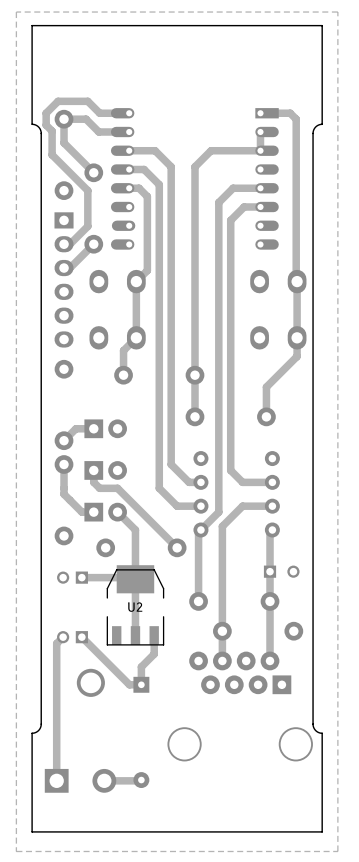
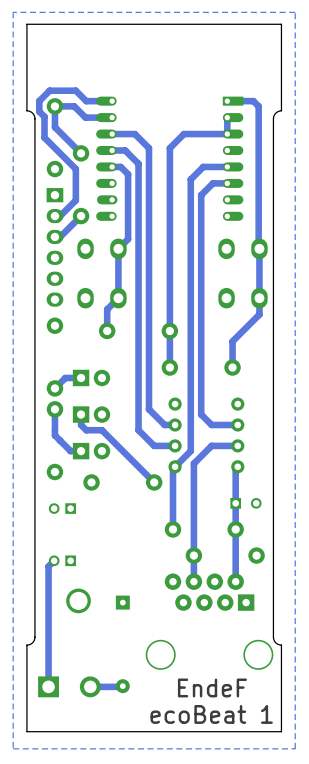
track: (117, 512) (135, 529) (135, 577) -> none
track: (81, 577) (133, 577) (135, 579) (135, 635) -> none
U2: (135, 605) -> none
track: (154, 635) (154, 654) (141, 666) (141, 684) (129, 684) (81, 637) -> none
text: none -> EndeF (212, 687)
text: none -> ecoBeat 1 (211, 714)

